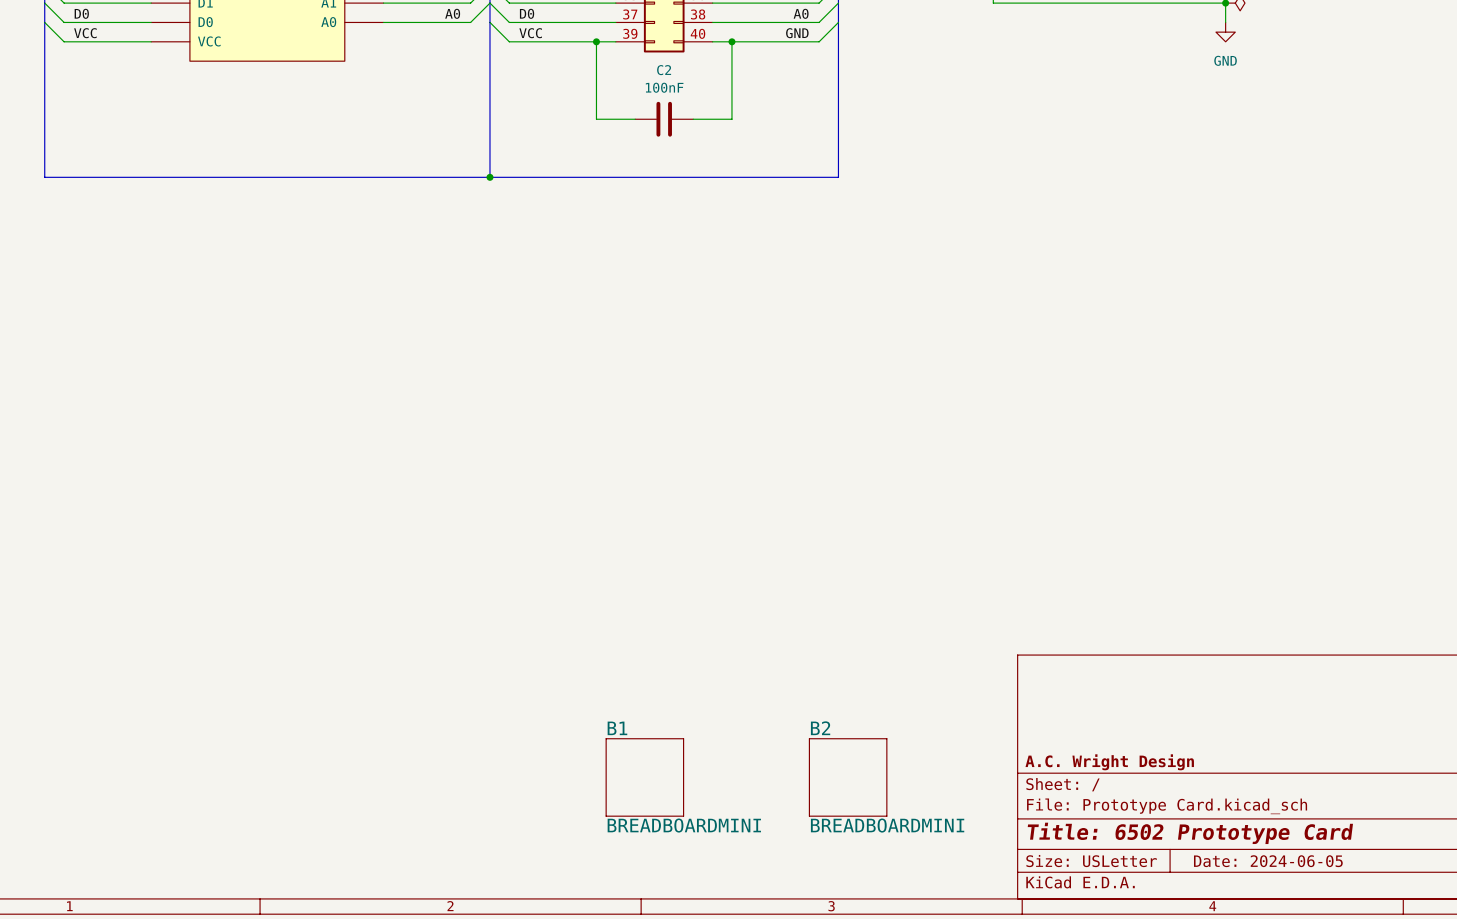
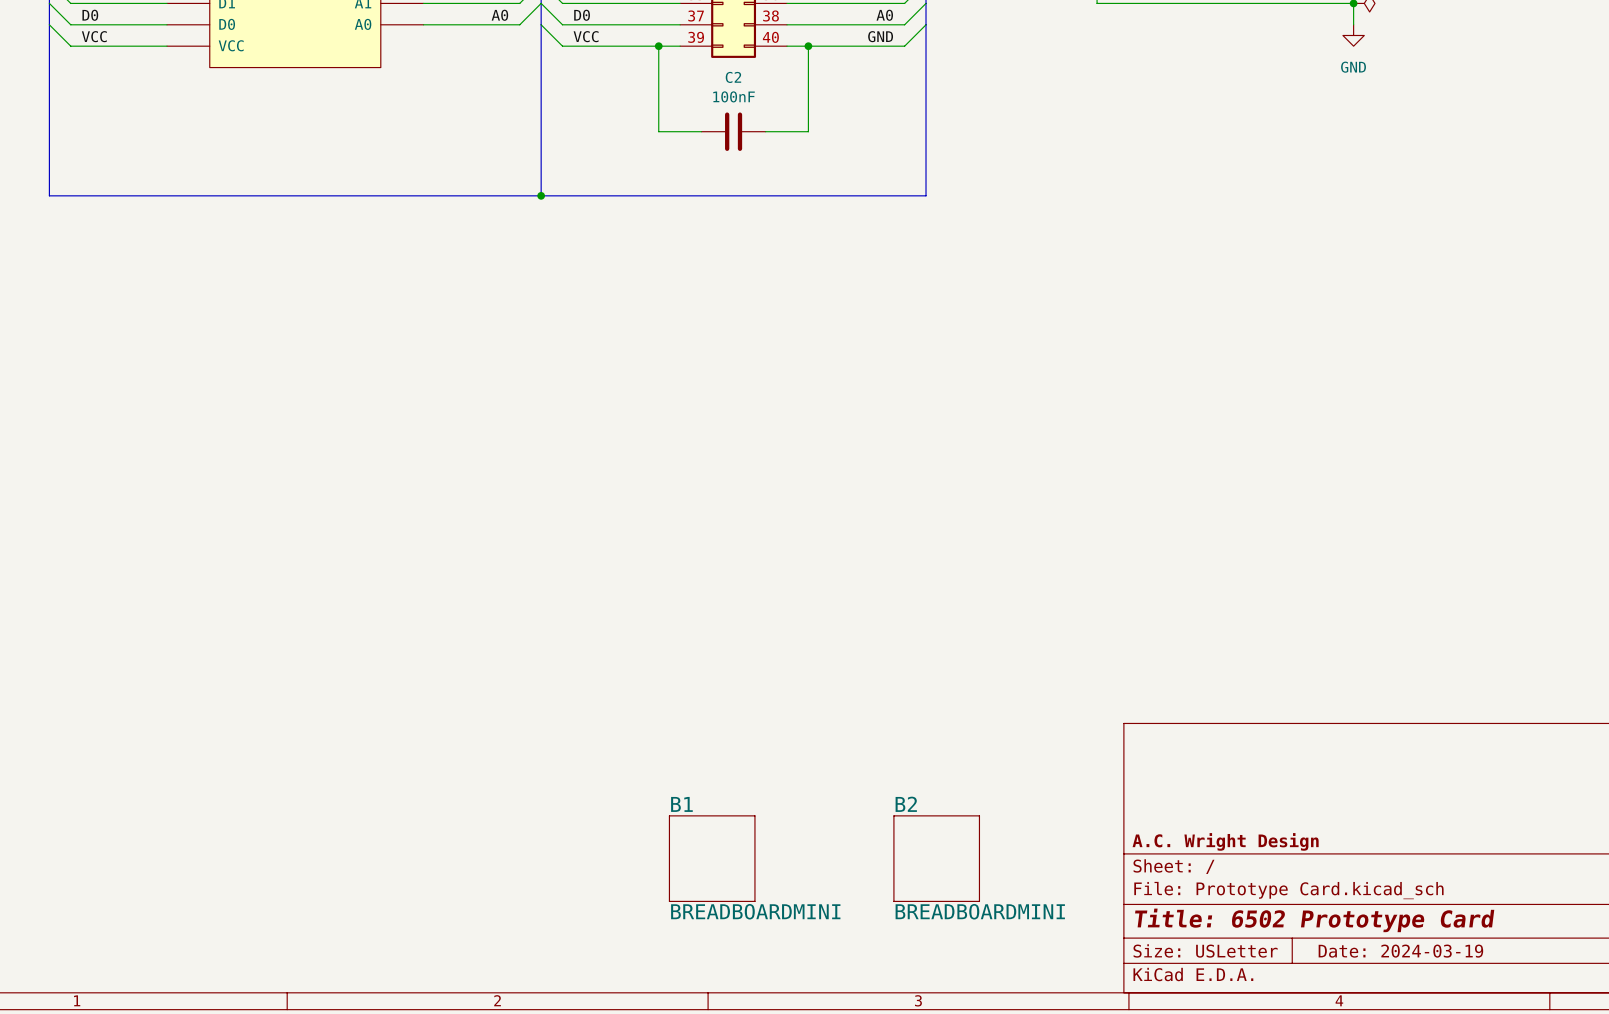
title block: Date: 2024-06-05 (1268, 861) -> Date: 2024-03-19 (1400, 951)

